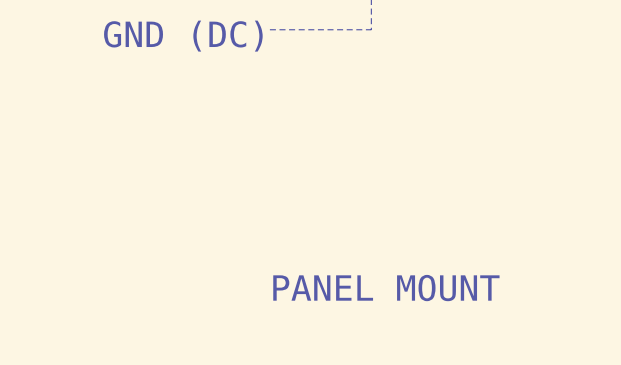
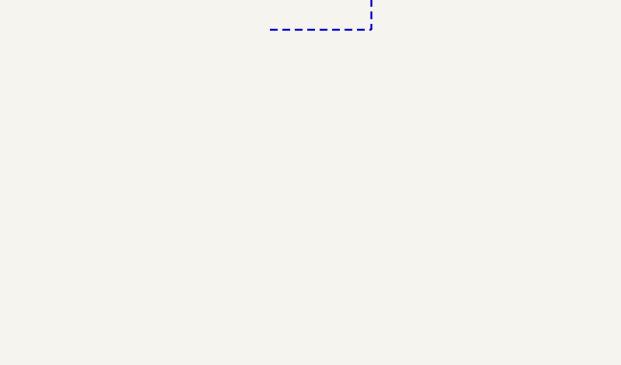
text: GND (DC) (183, 36) -> none
text: PANEL MOUNT (386, 288) -> none

